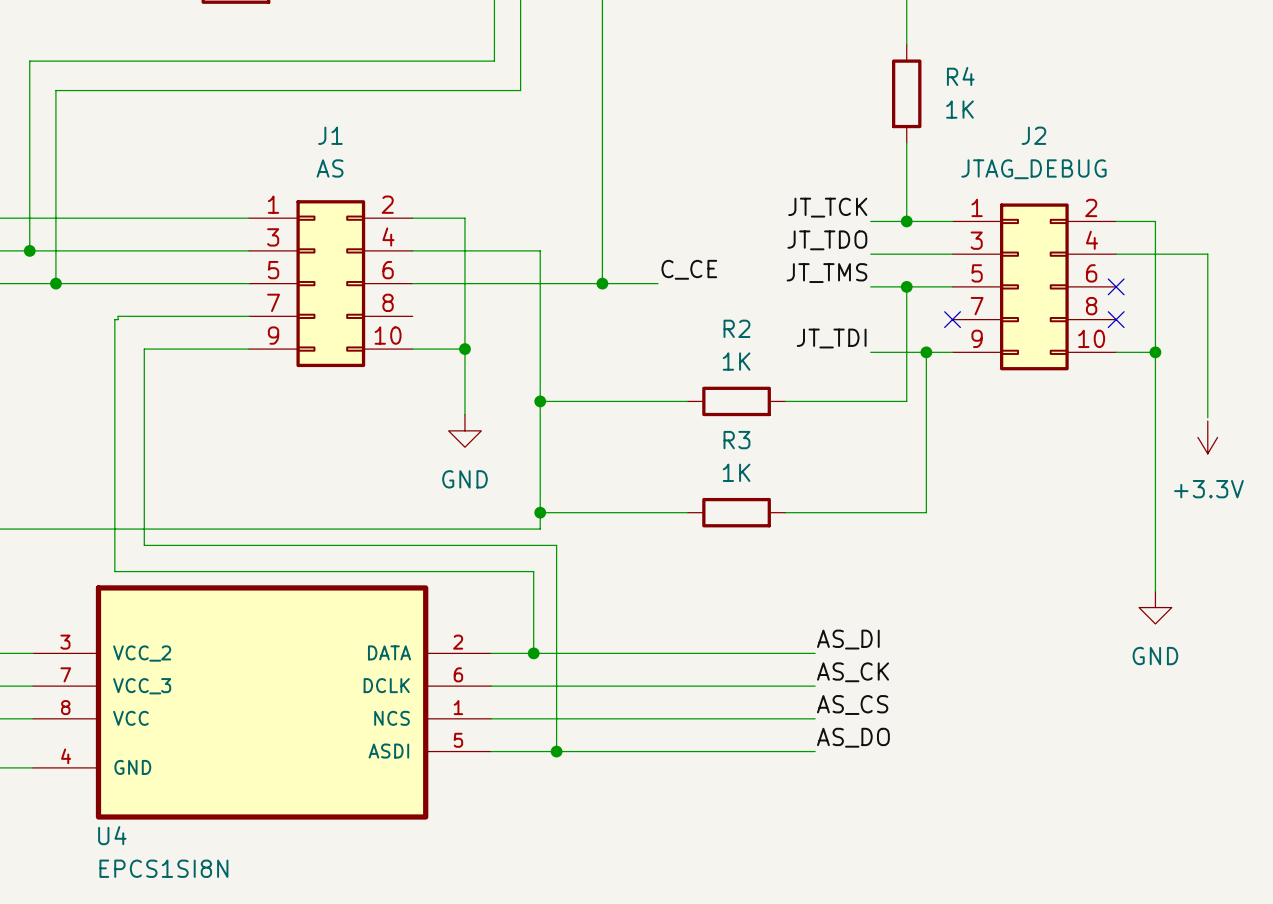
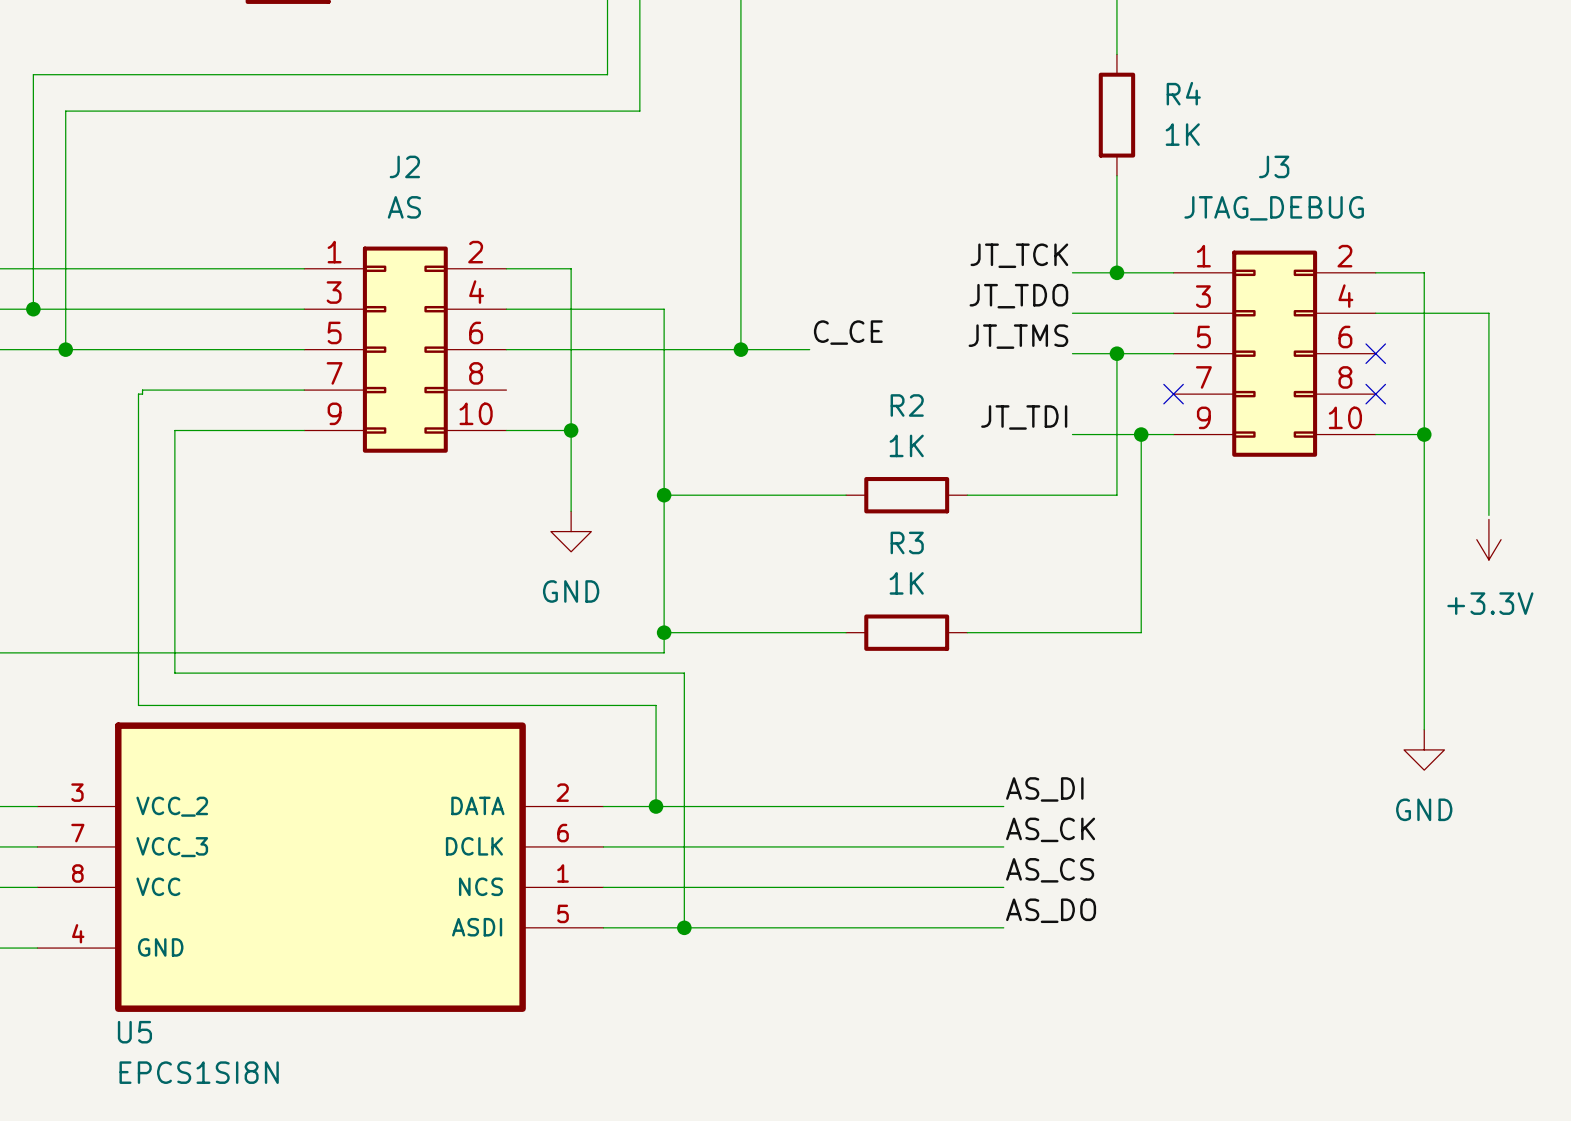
J1 name: J1 (330, 135) -> J2 (404, 166)
J2 name: J2 (1033, 135) -> J3 (1274, 166)
U4 name: U4 (112, 835) -> U5 (134, 1032)

